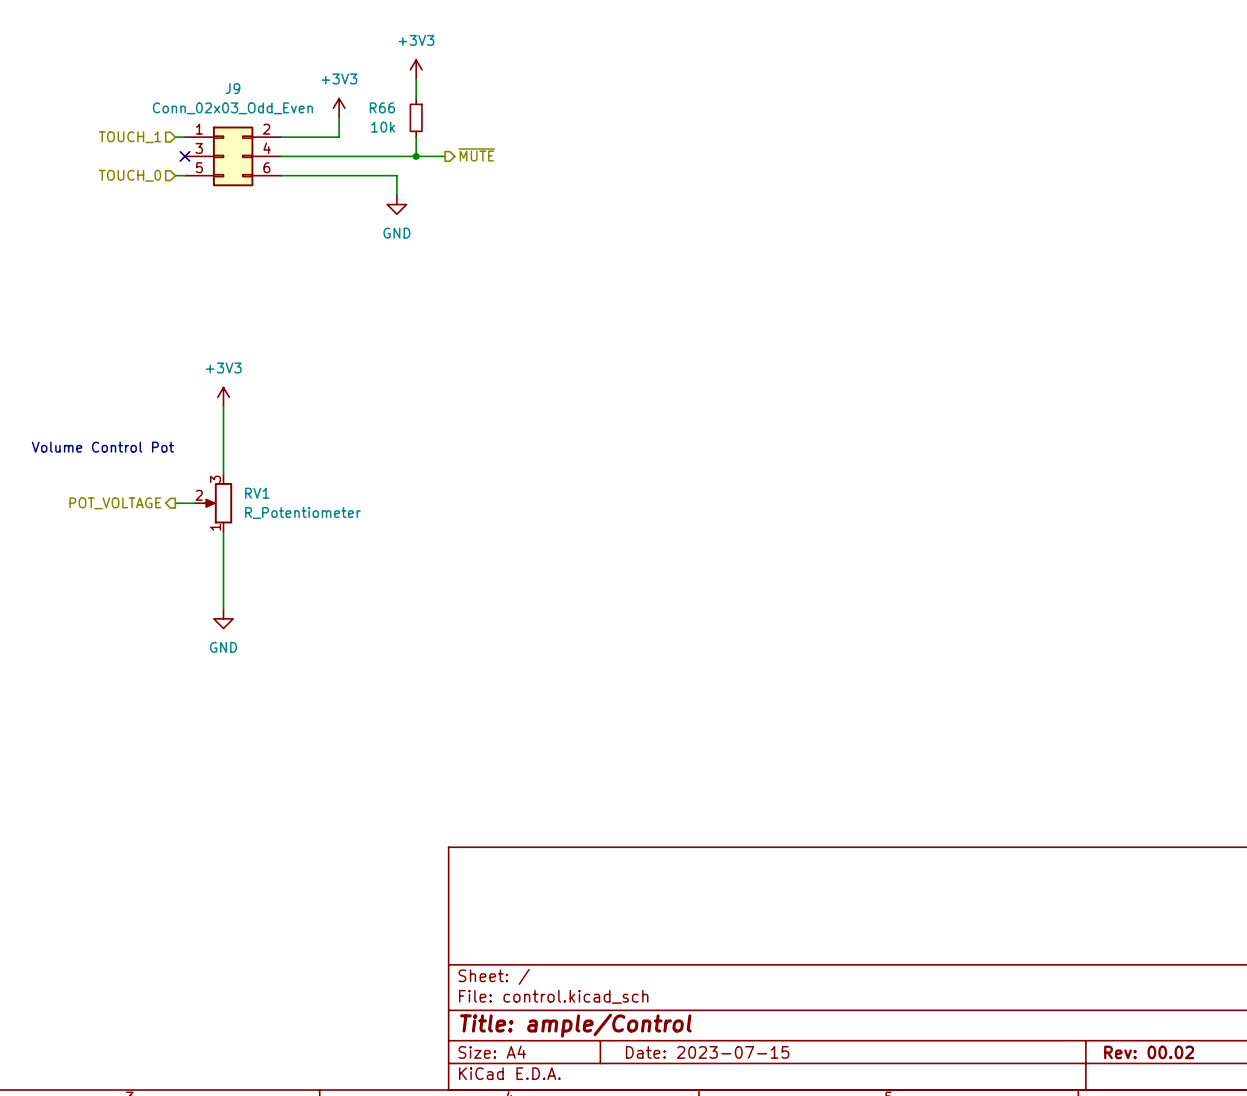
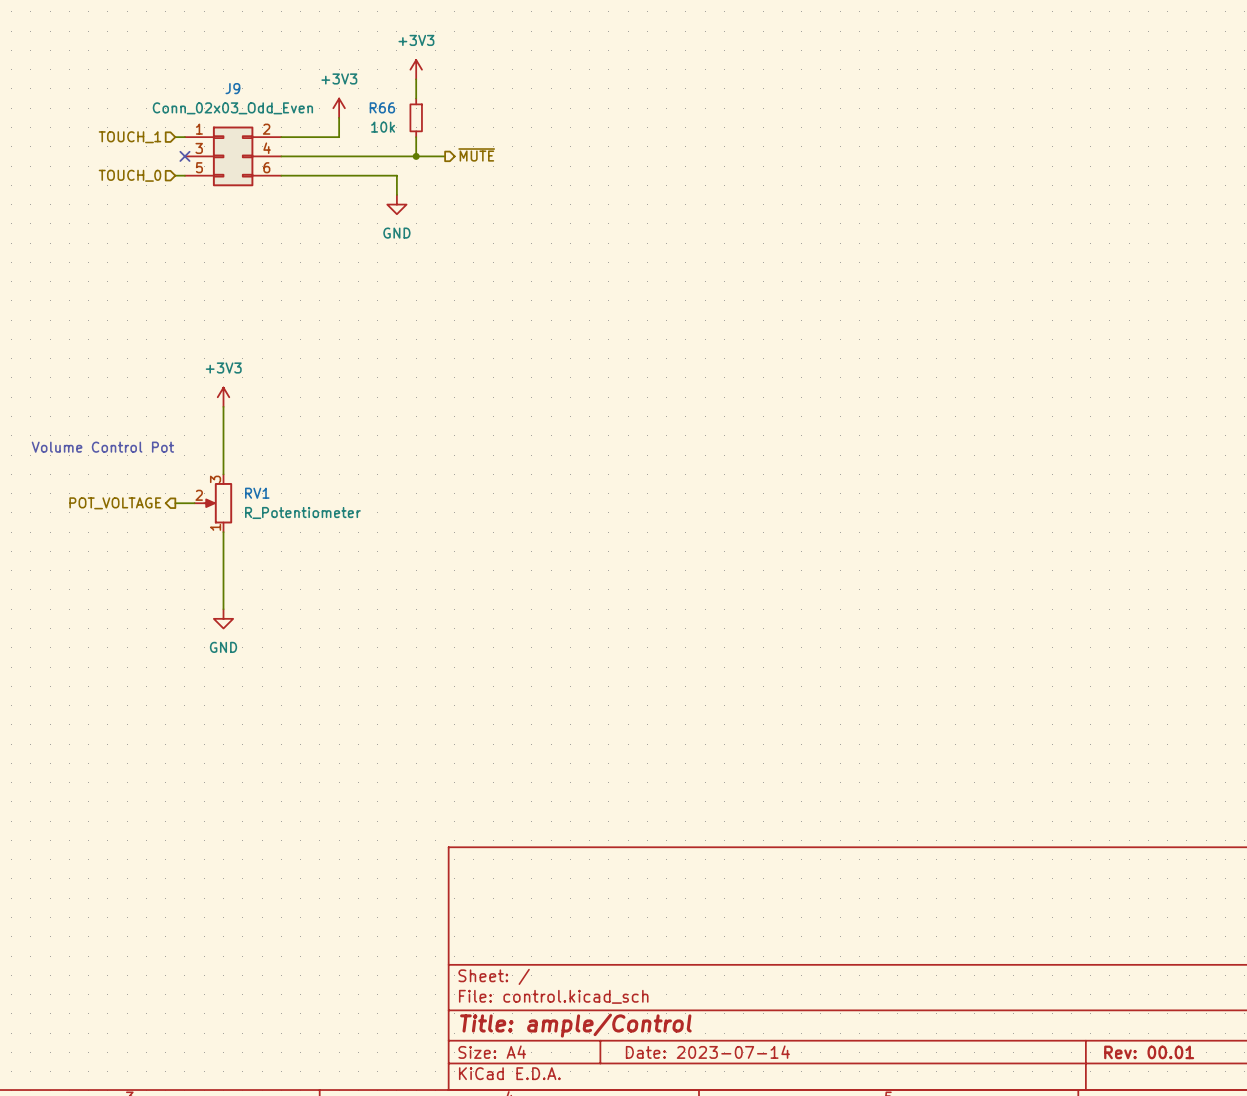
title block: Date: 2023-07-15 (707, 1052) -> Date: 2023-07-14 (707, 1052)
title block: Rev: 00.02 (1149, 1052) -> Rev: 00.01 (1149, 1052)

